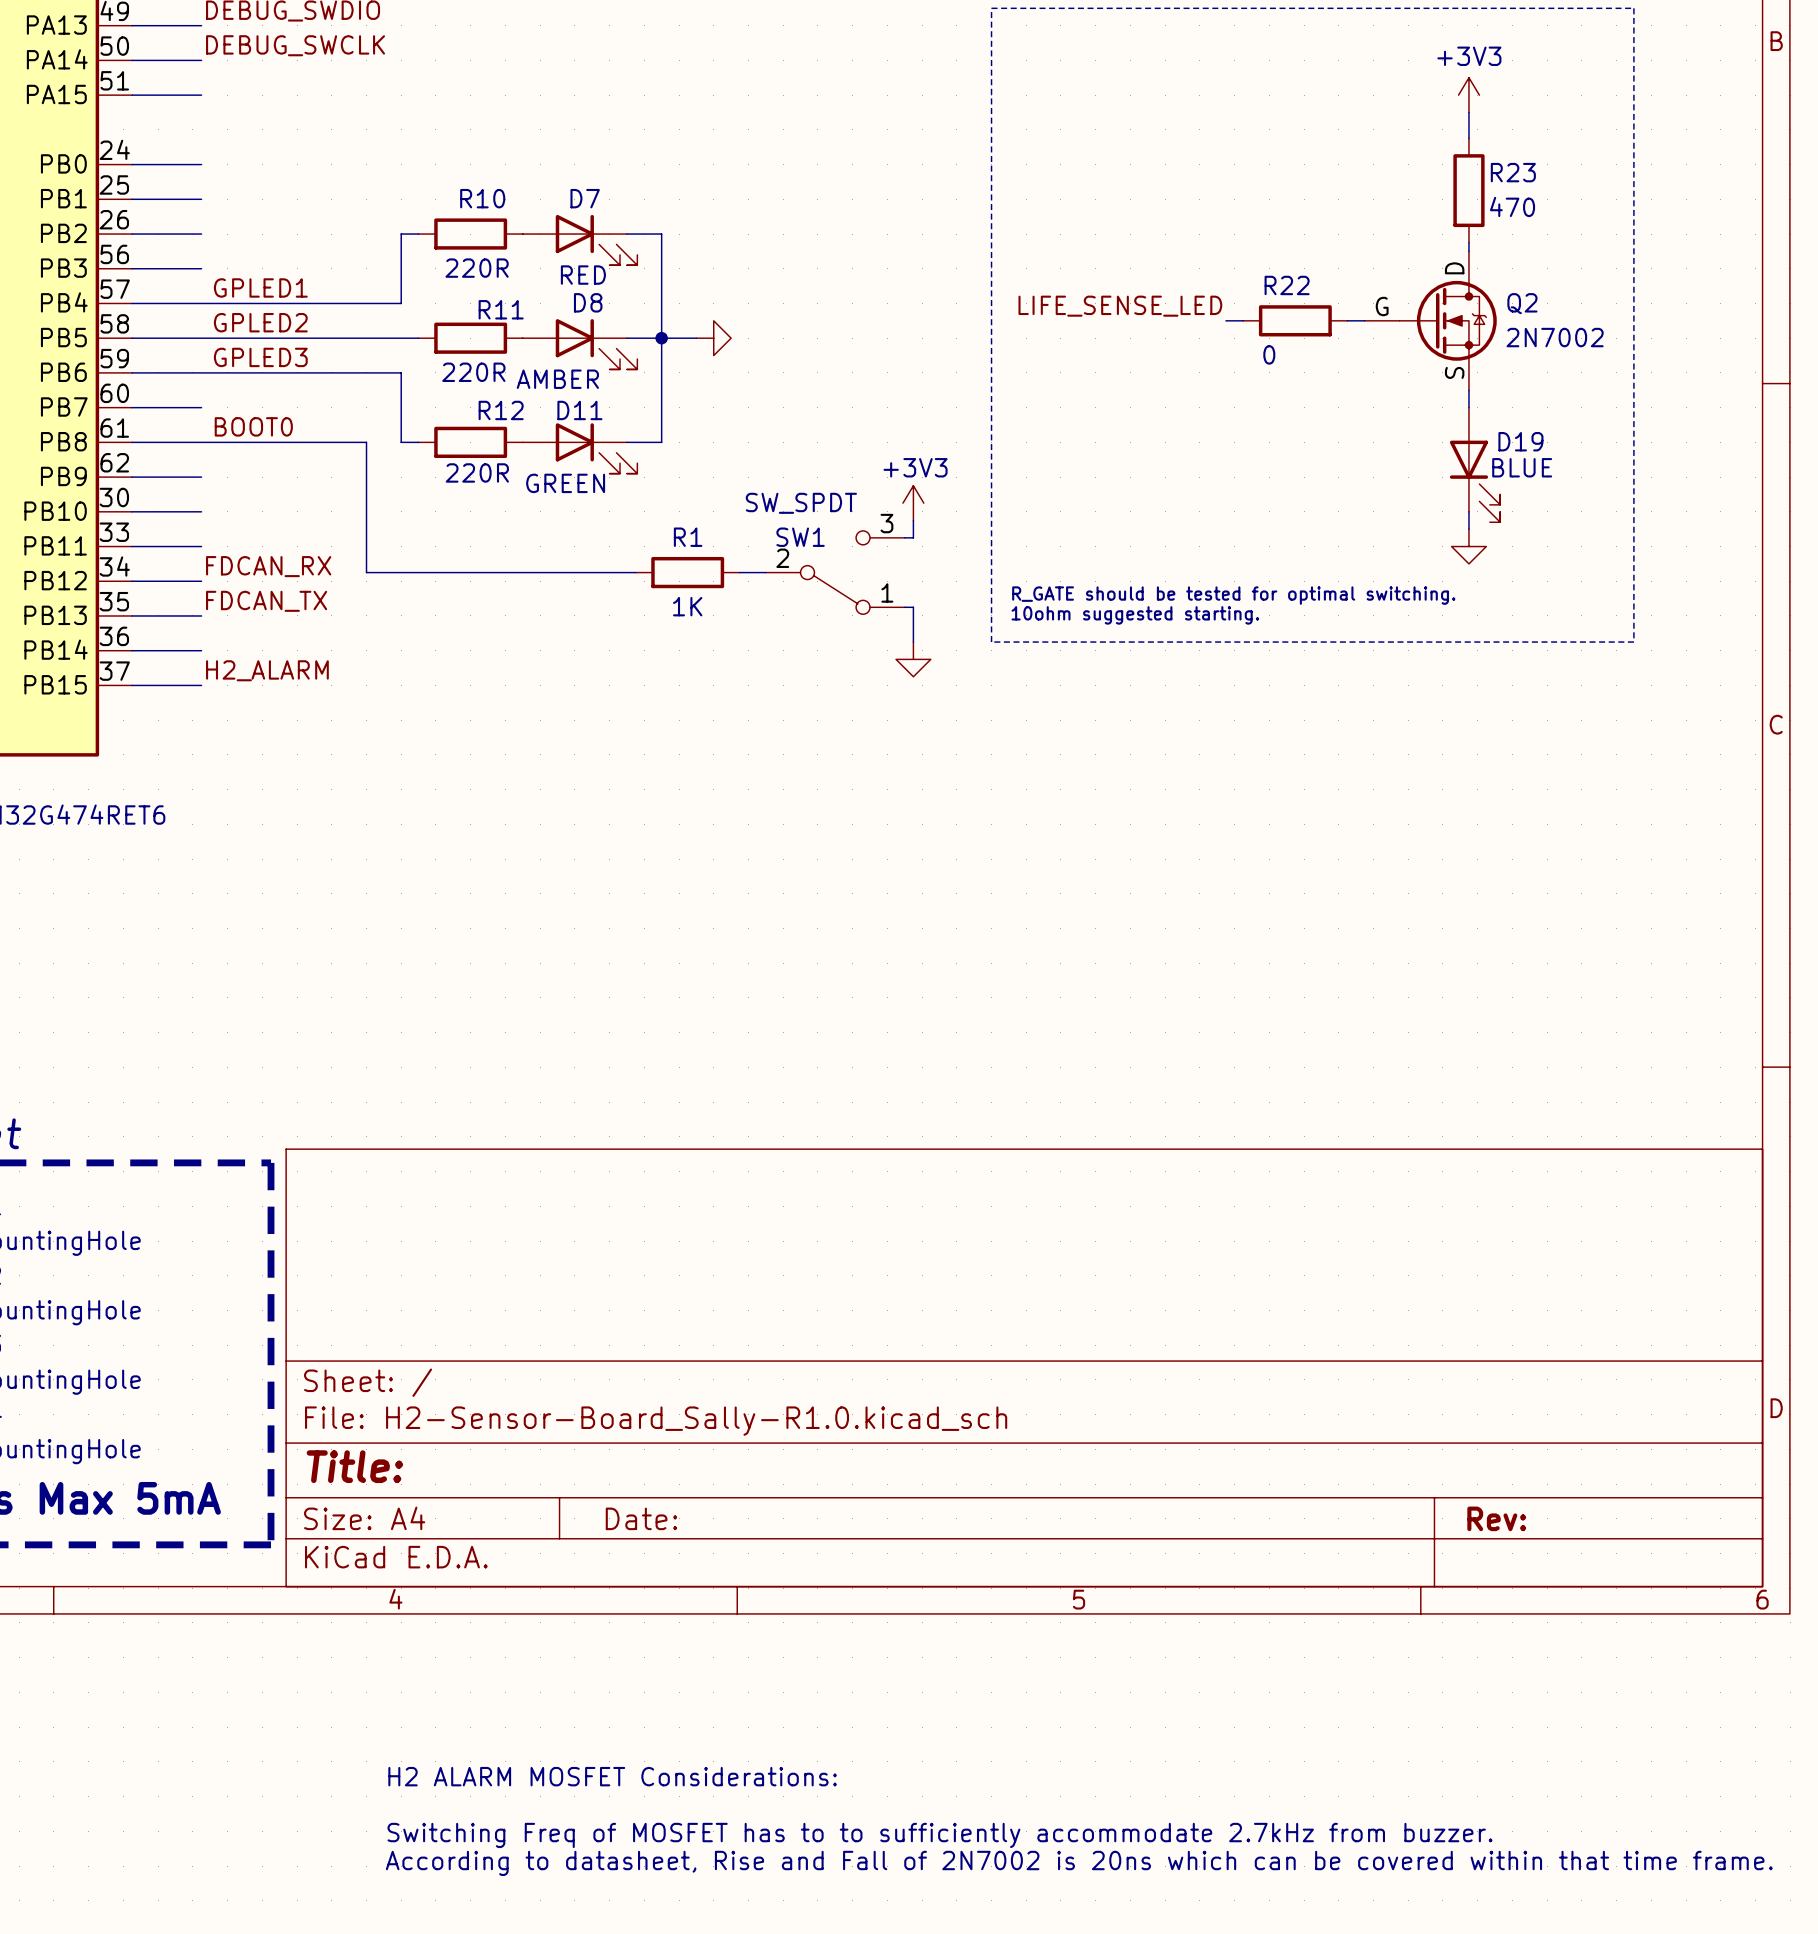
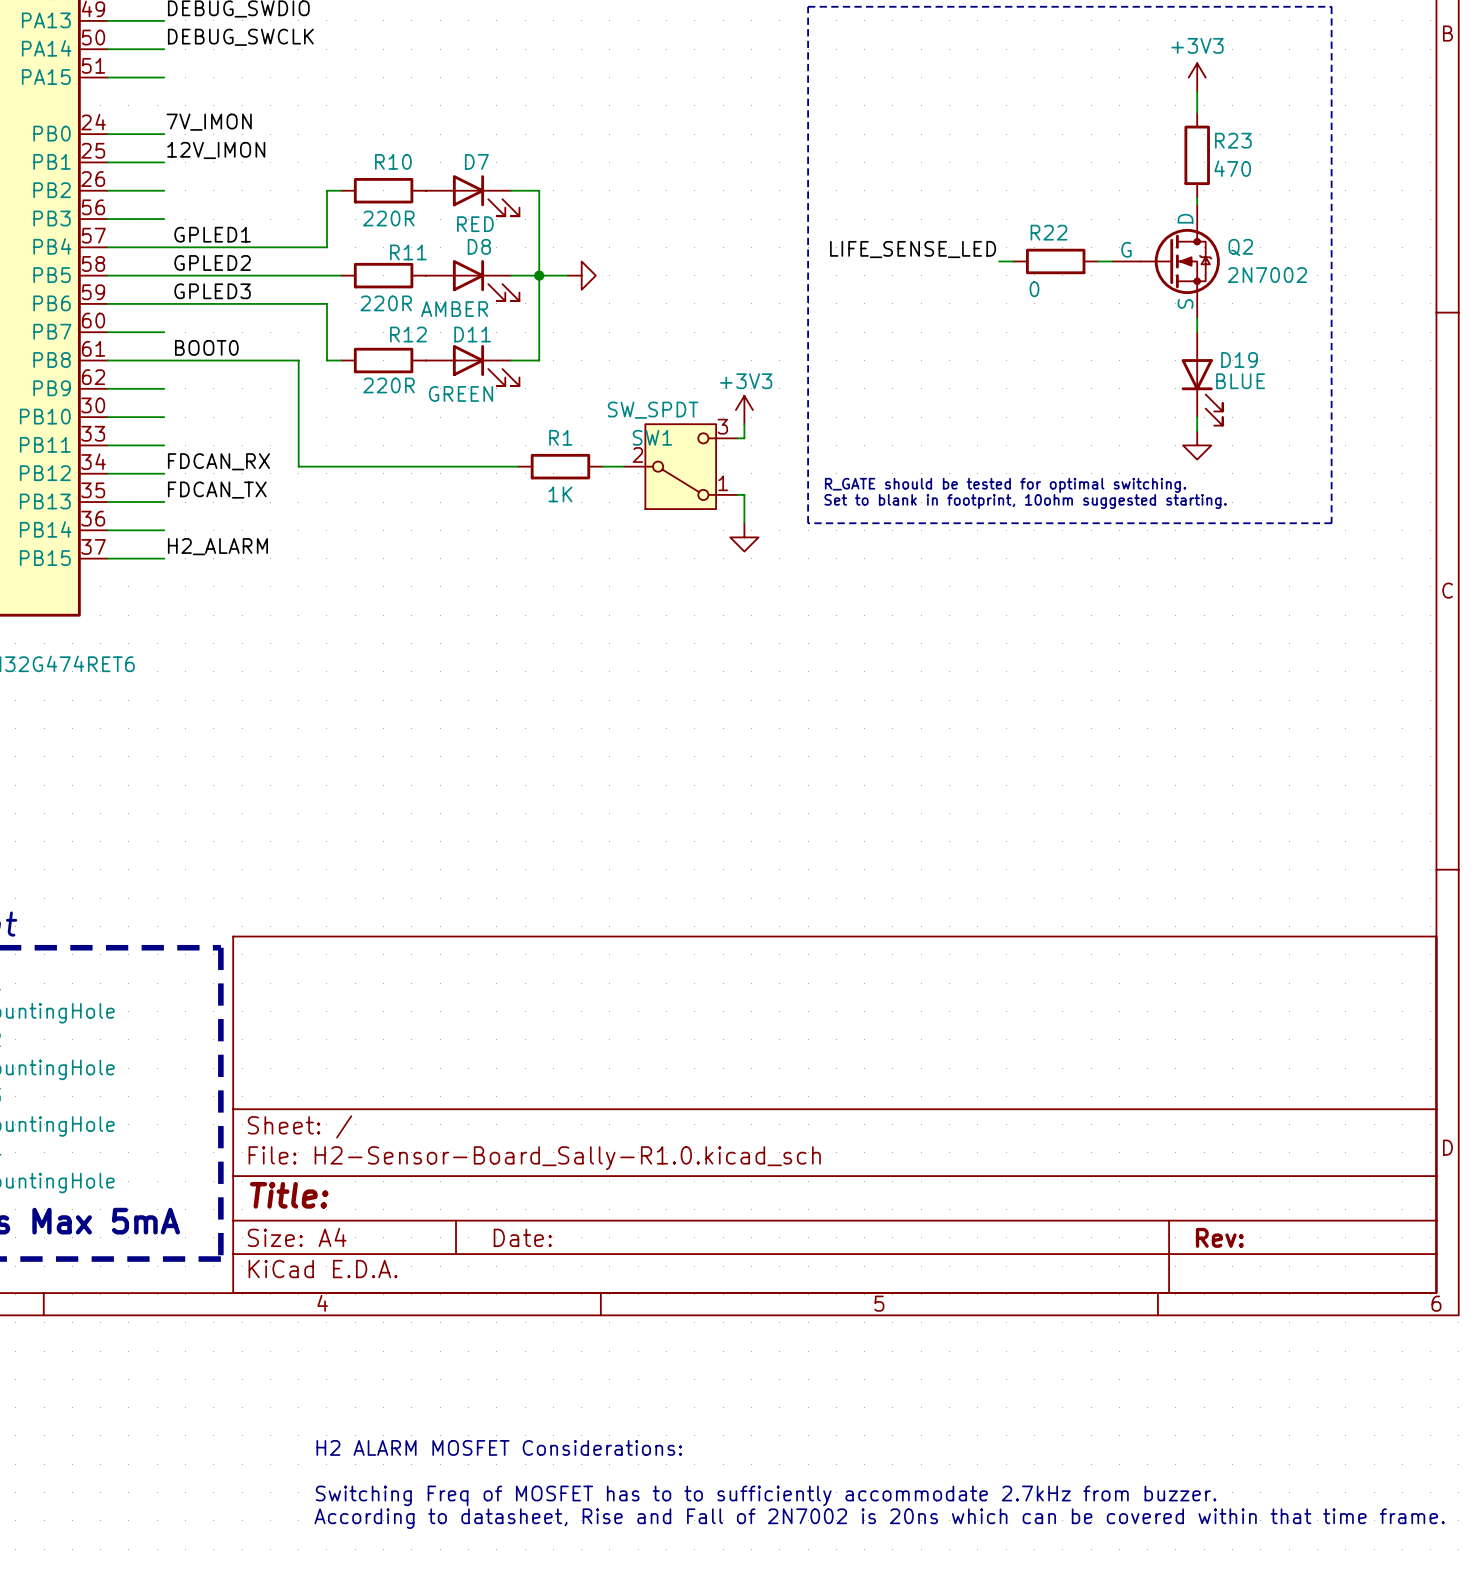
label: none -> 7V_IMON (209, 122)
label: none -> 12V_IMON (216, 150)
SW1 symbol: [765, 530, 905, 615] -> [624, 424, 738, 510]
text: 10ohm suggested starting. (1135, 615) -> Set to blank in footprint, 10ohm suggested starting. (1025, 501)

